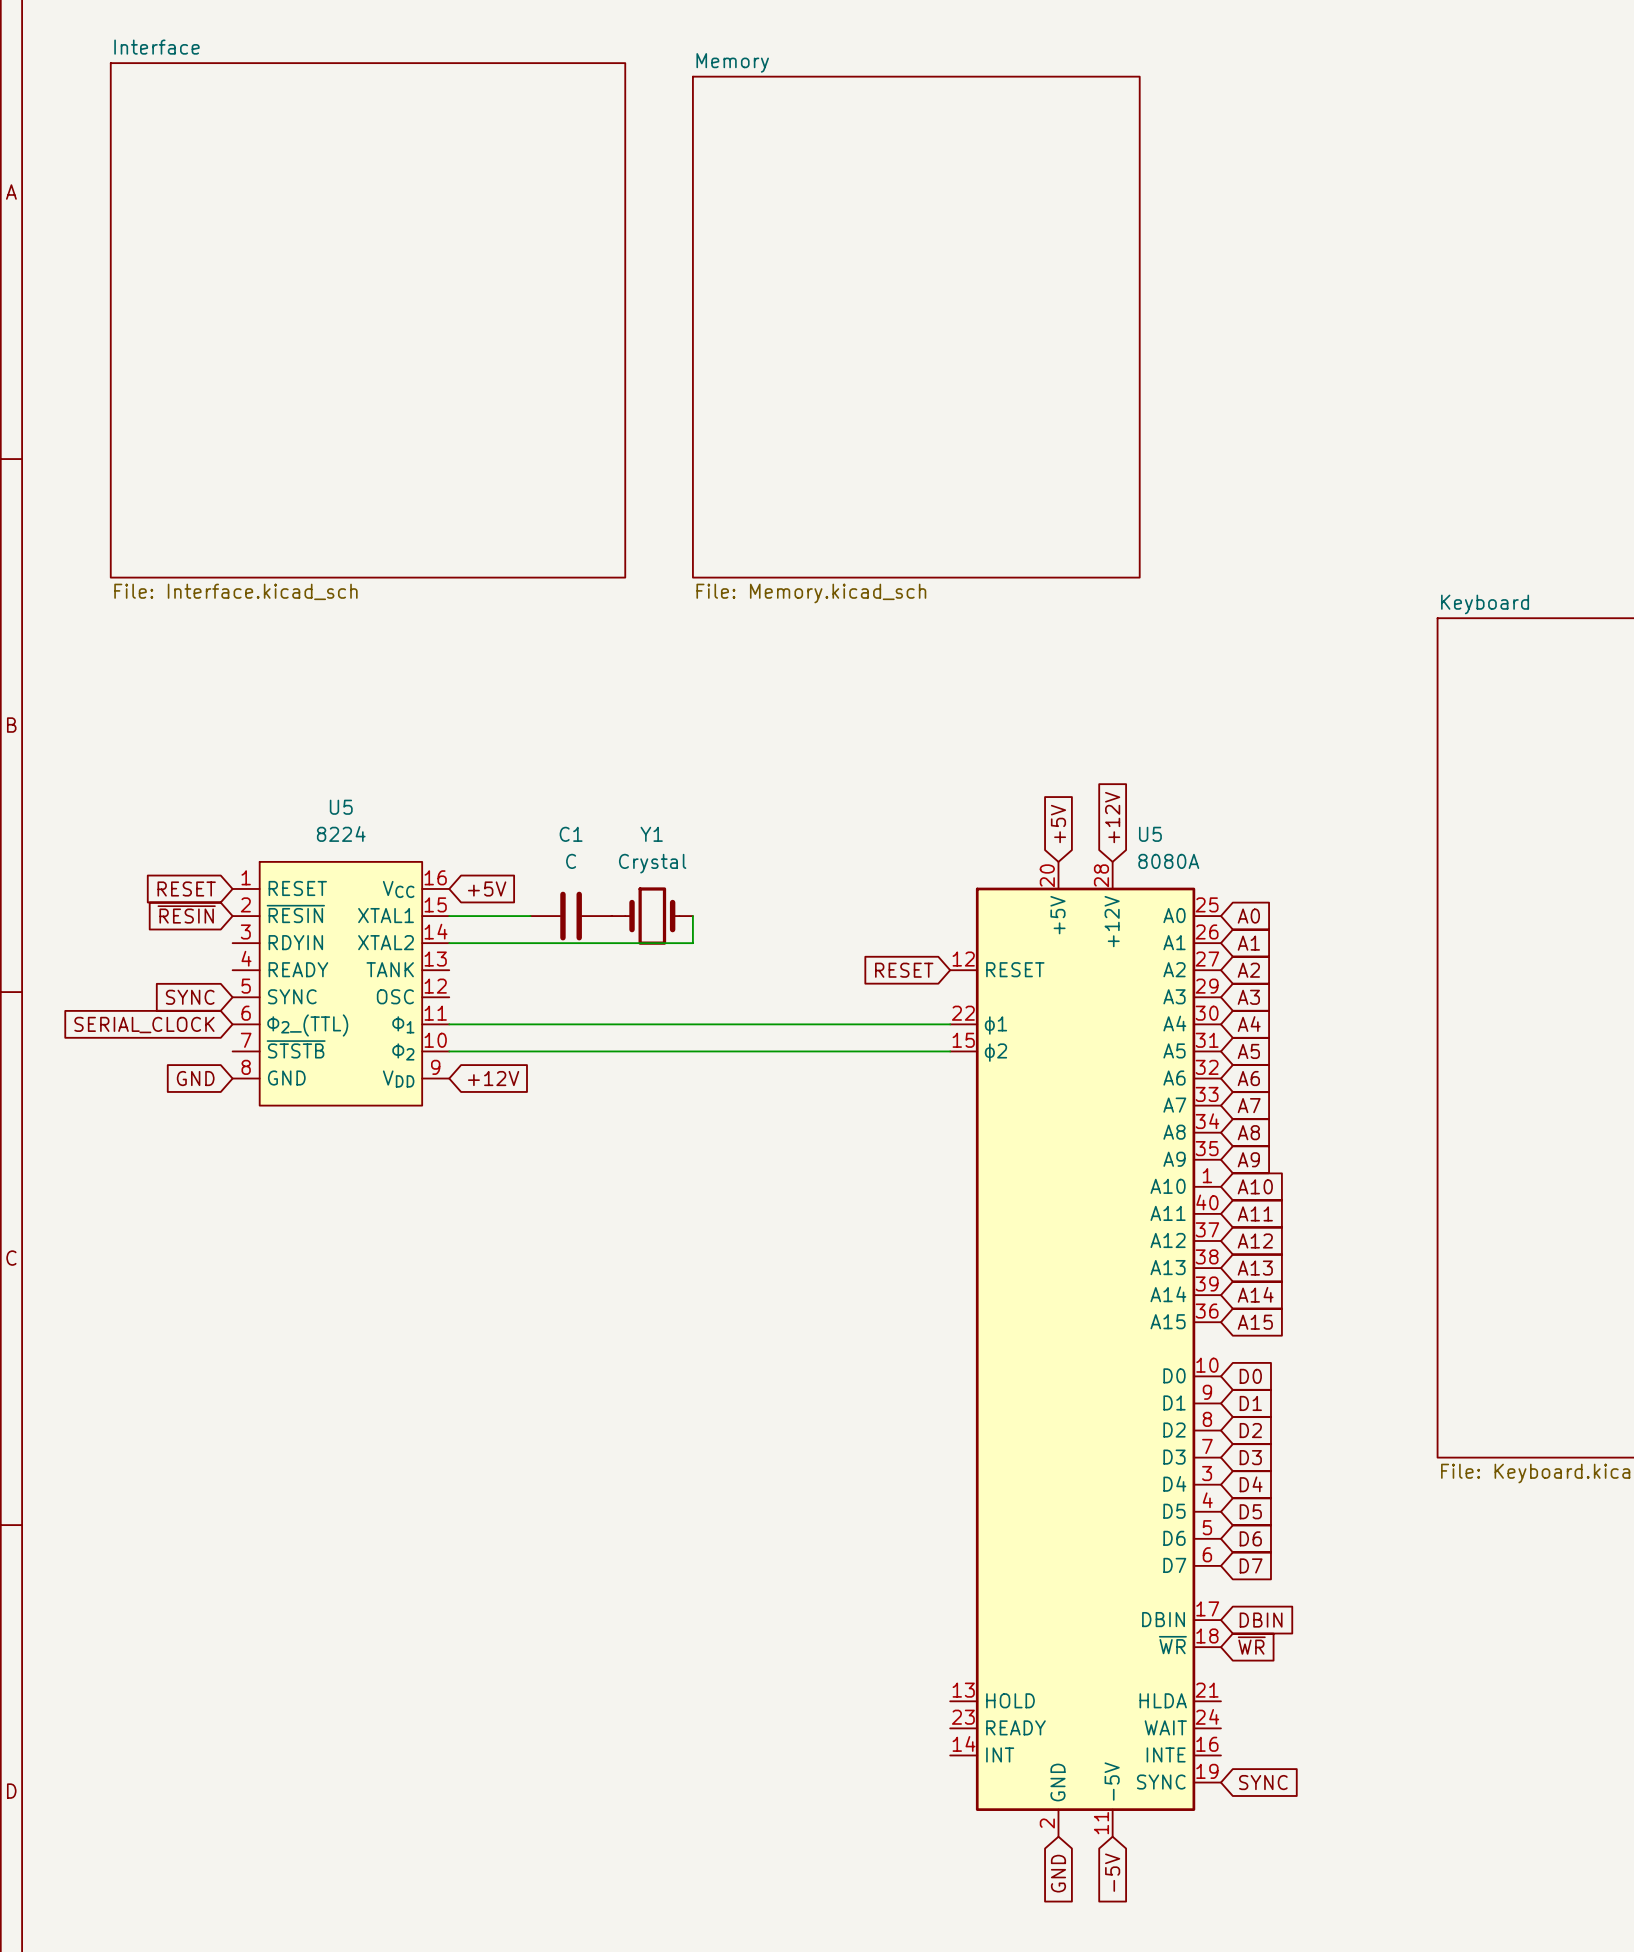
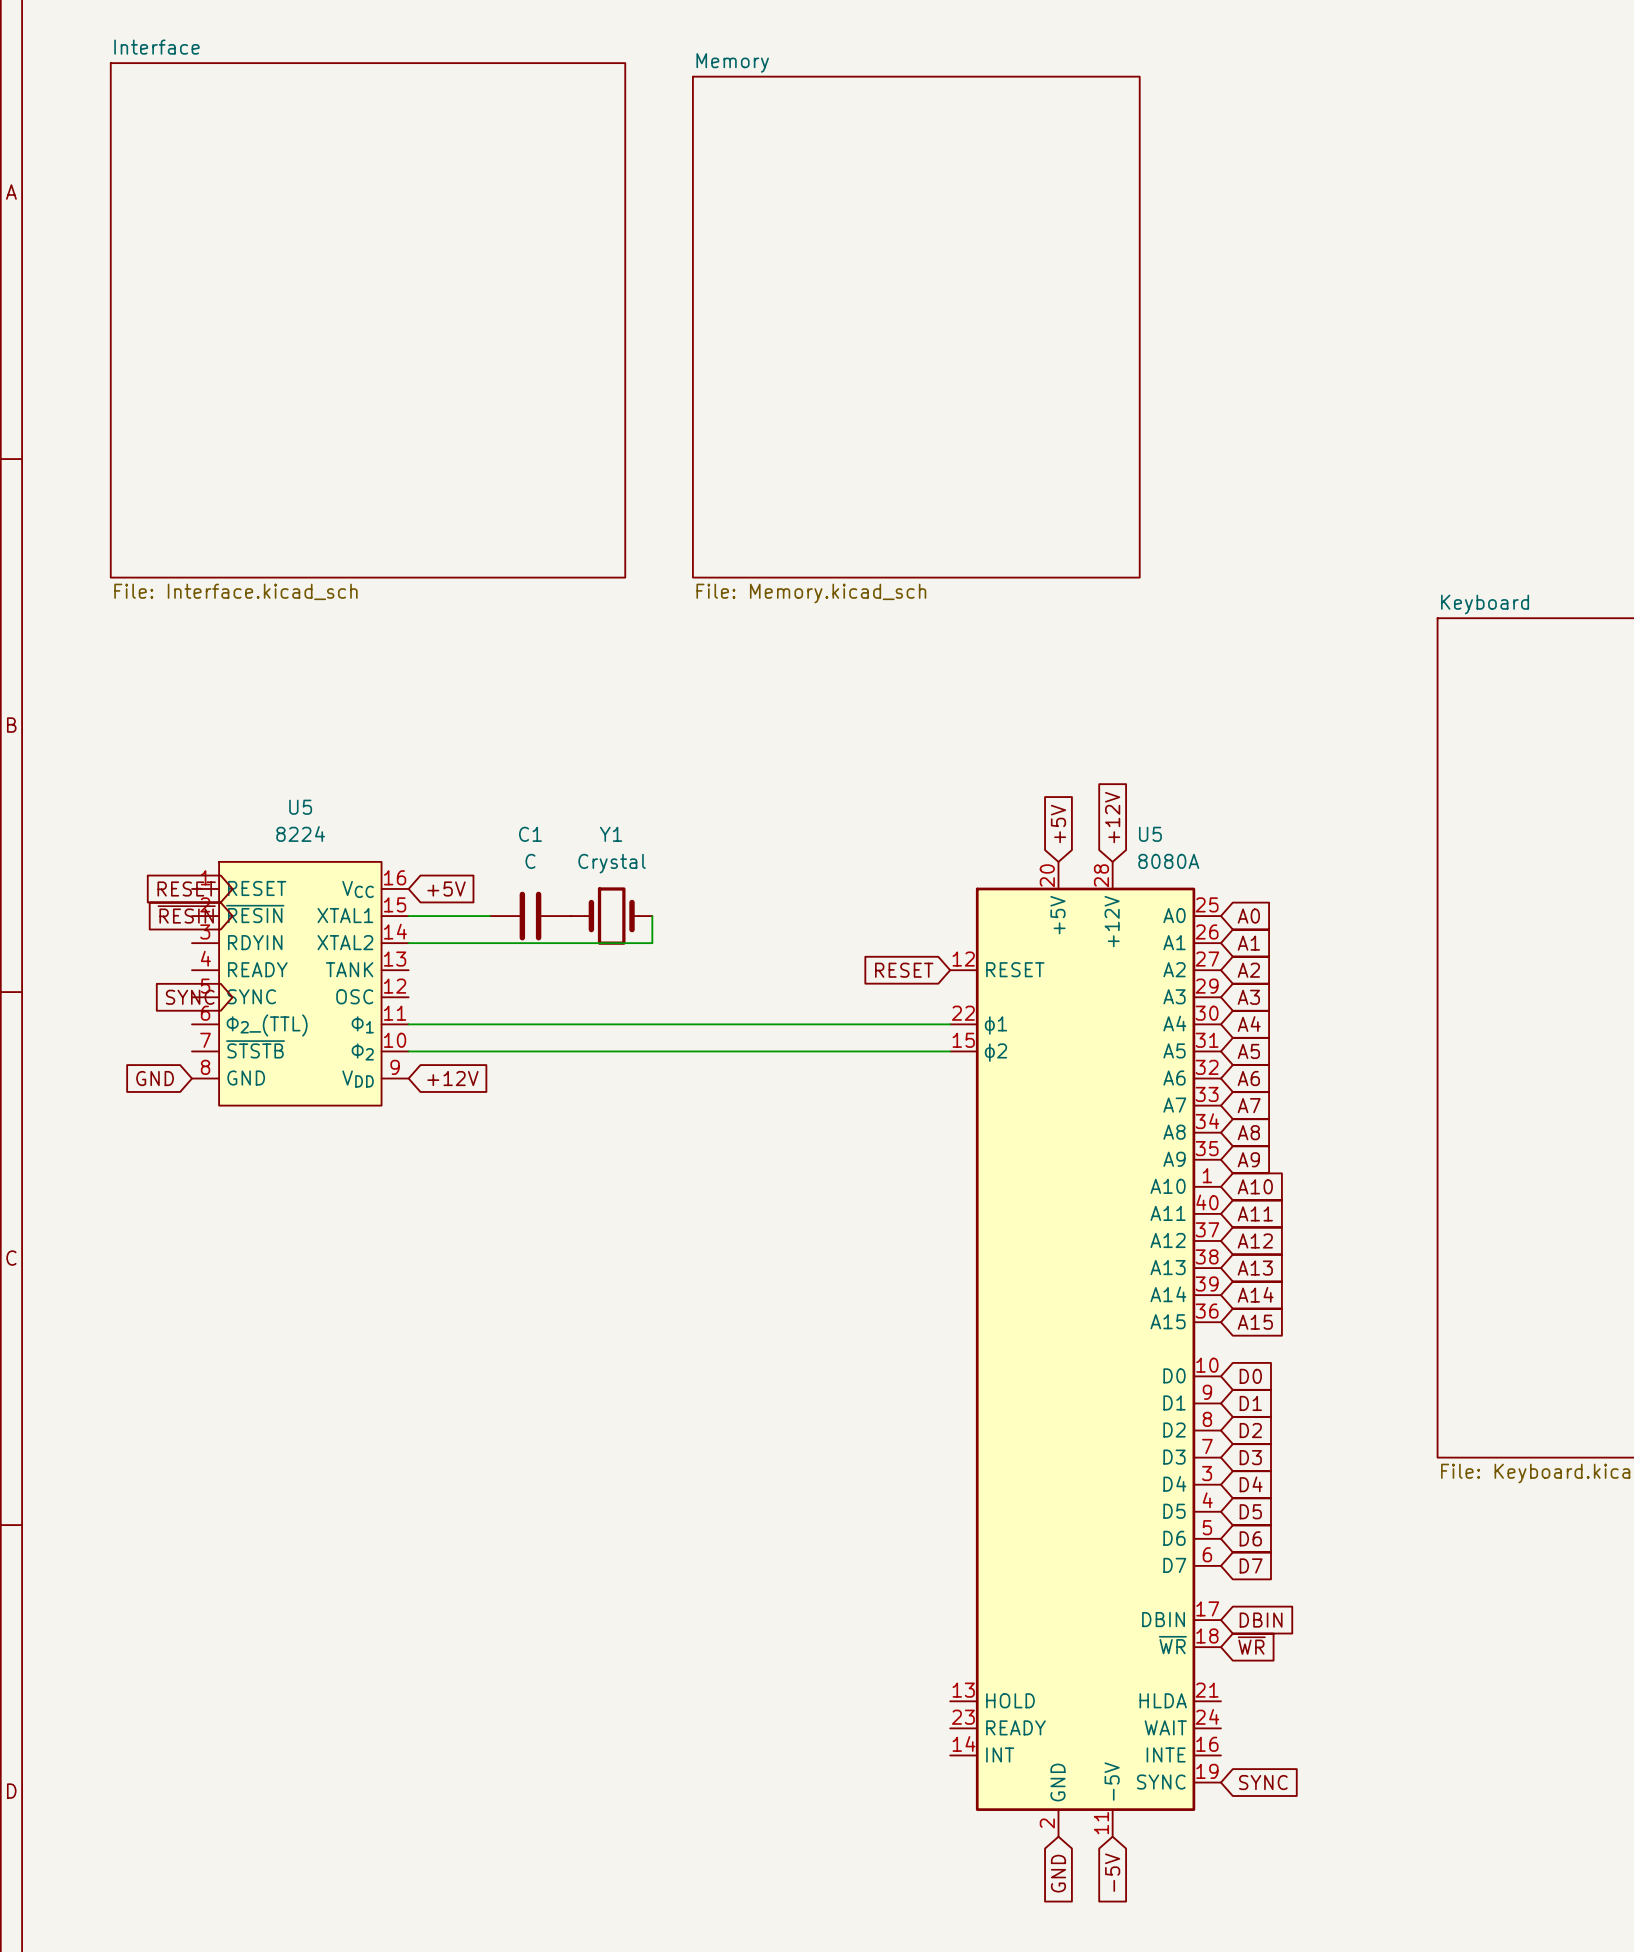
global label position: +5V (487, 888) -> +5V (446, 888)
C1 position: (571, 916) -> (530, 916)
Y1 position: (652, 916) -> (611, 916)
wire: (692, 916) (692, 943) (652, 943) -> (652, 916) (652, 943)
U5 position: (340, 983) -> (300, 983)
global label: SERIAL_CLOCK (144, 1025) -> none
global label position: GND (195, 1078) -> GND (155, 1078)
global label position: +12V (493, 1078) -> +12V (452, 1078)

